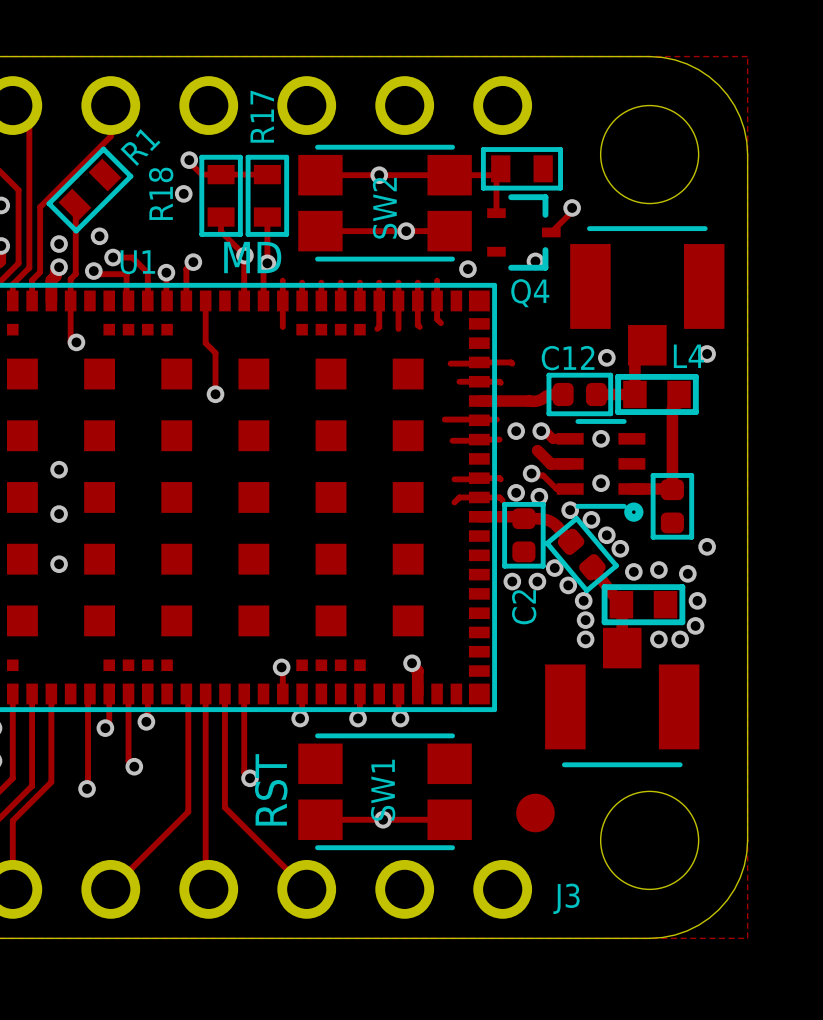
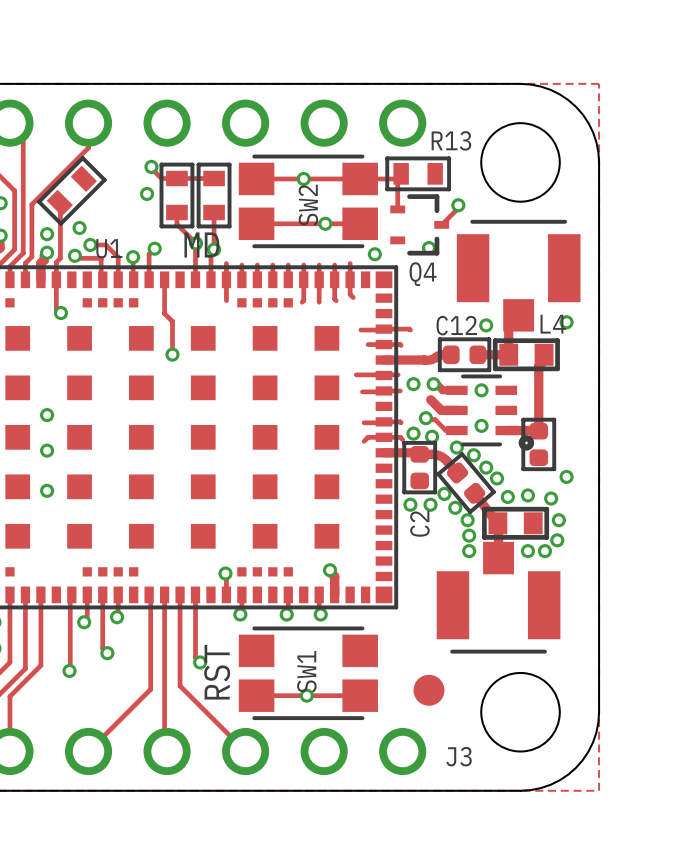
R17 name: R17 (262, 116) -> none
R13 name: none -> R13 (451, 140)
R1 name: R1 (140, 147) -> none
R18 name: R18 (161, 193) -> none
part footprint: [556, 419, 646, 522] -> [445, 374, 535, 451]

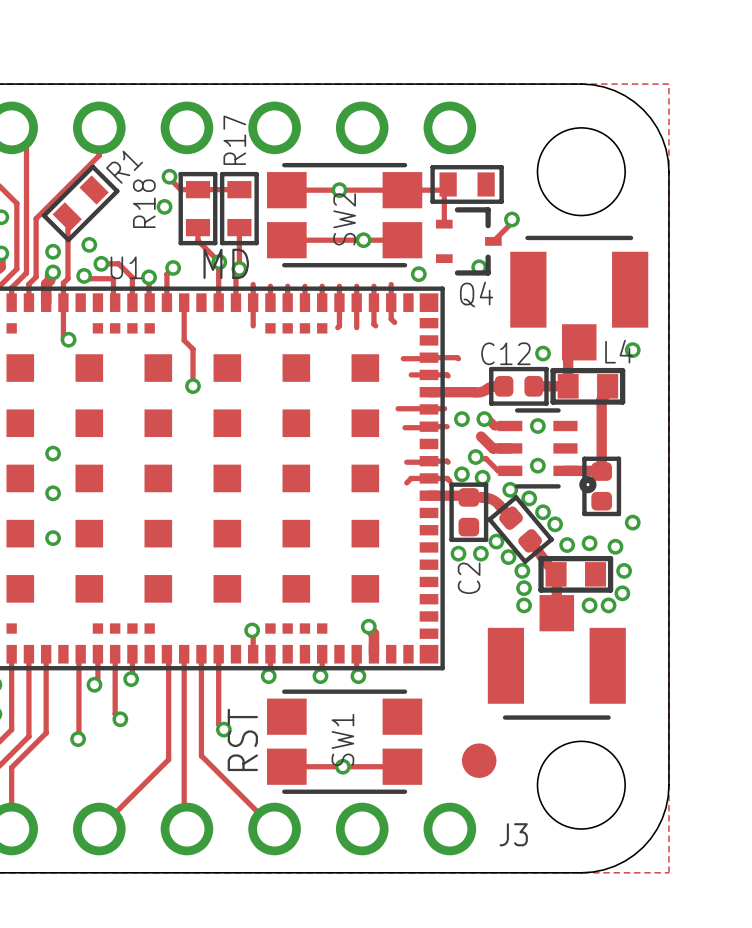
R17 name: none -> R17 (234, 140)
R13 name: R13 (451, 140) -> none
R1 name: none -> R1 (124, 167)
R18 name: none -> R18 (144, 203)

